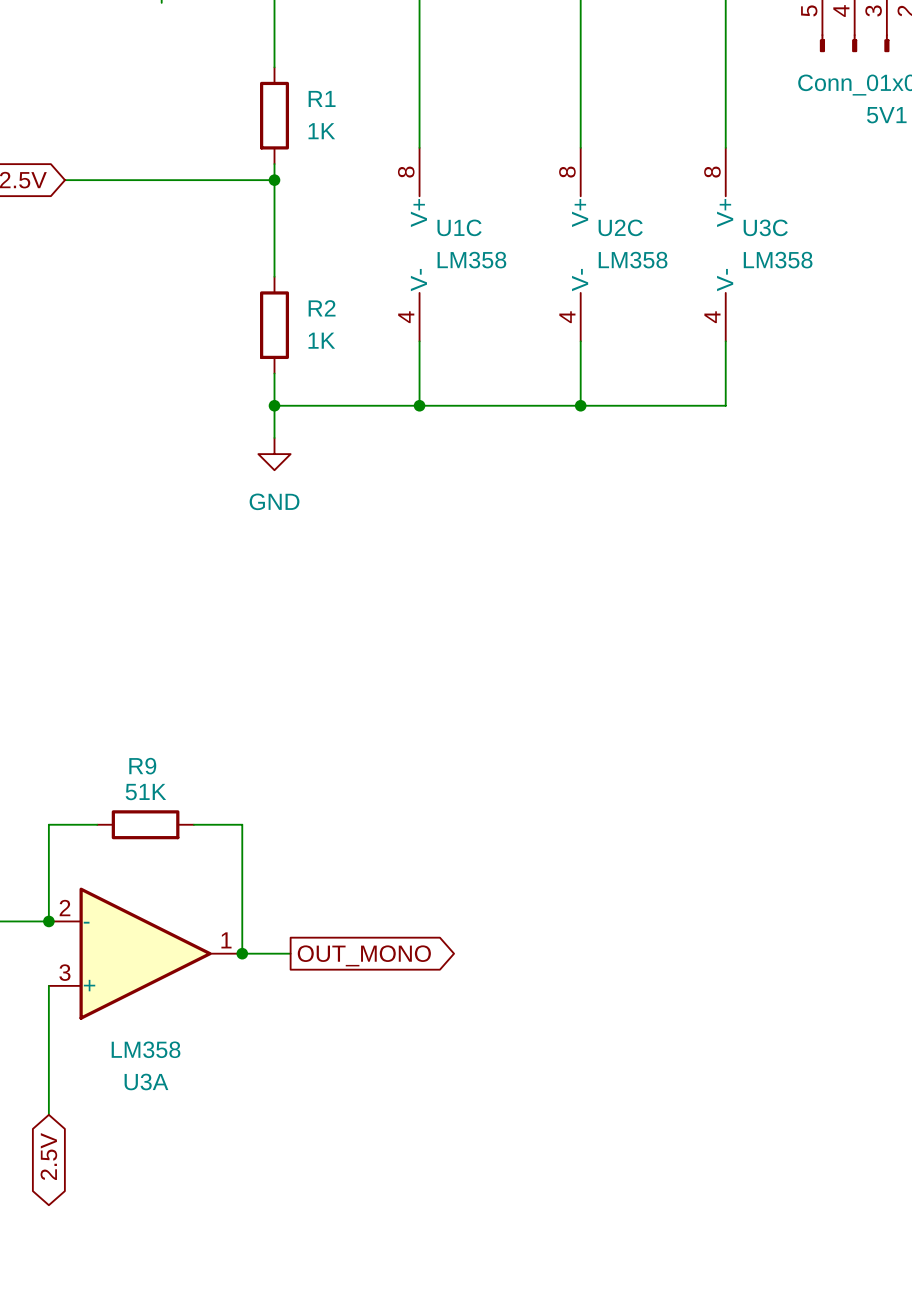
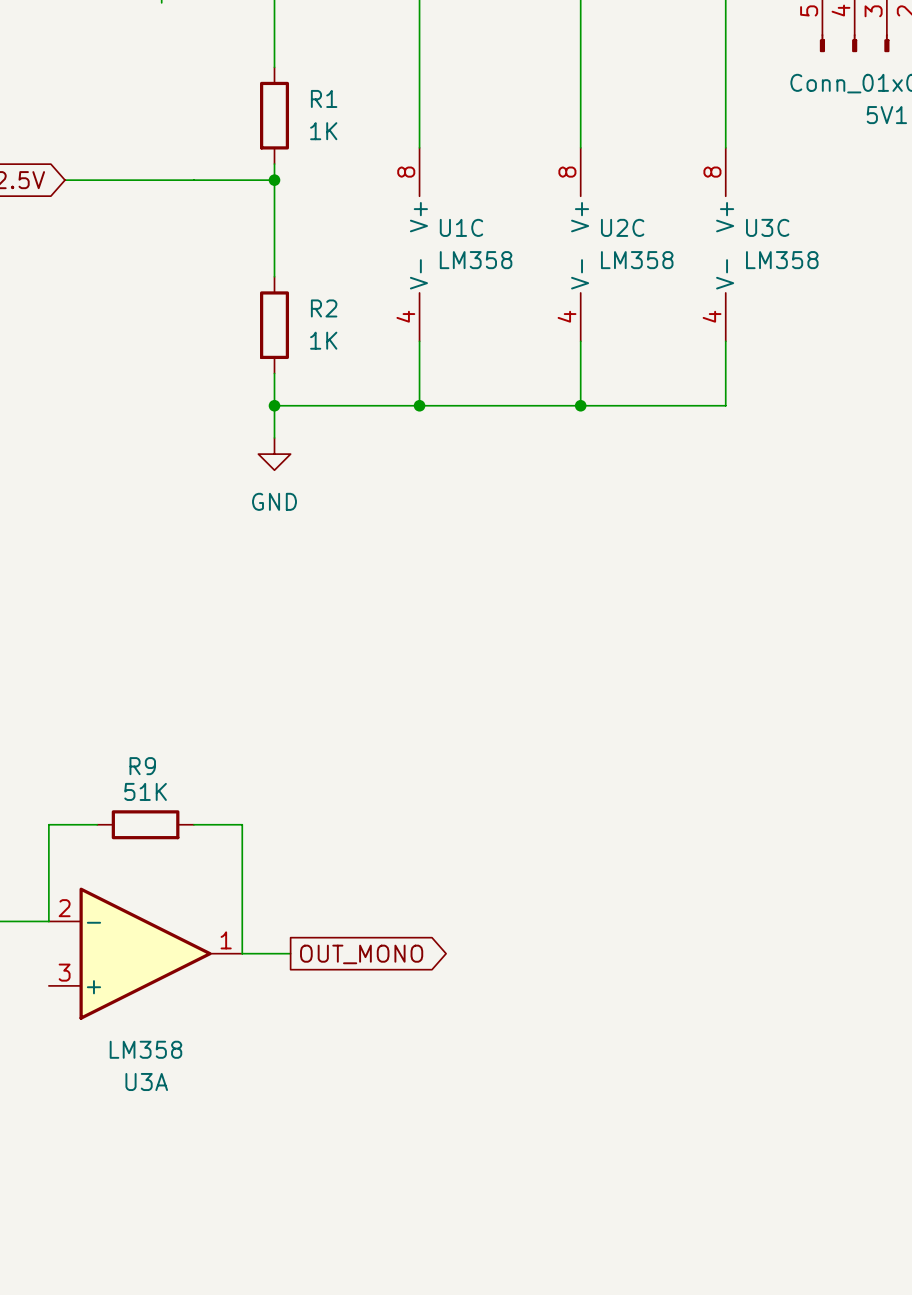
junction: (48, 921) -> none
junction: (242, 953) -> none
wire: (48, 985) (48, 1114) -> none
global label: 2.5V (48, 1156) -> none

